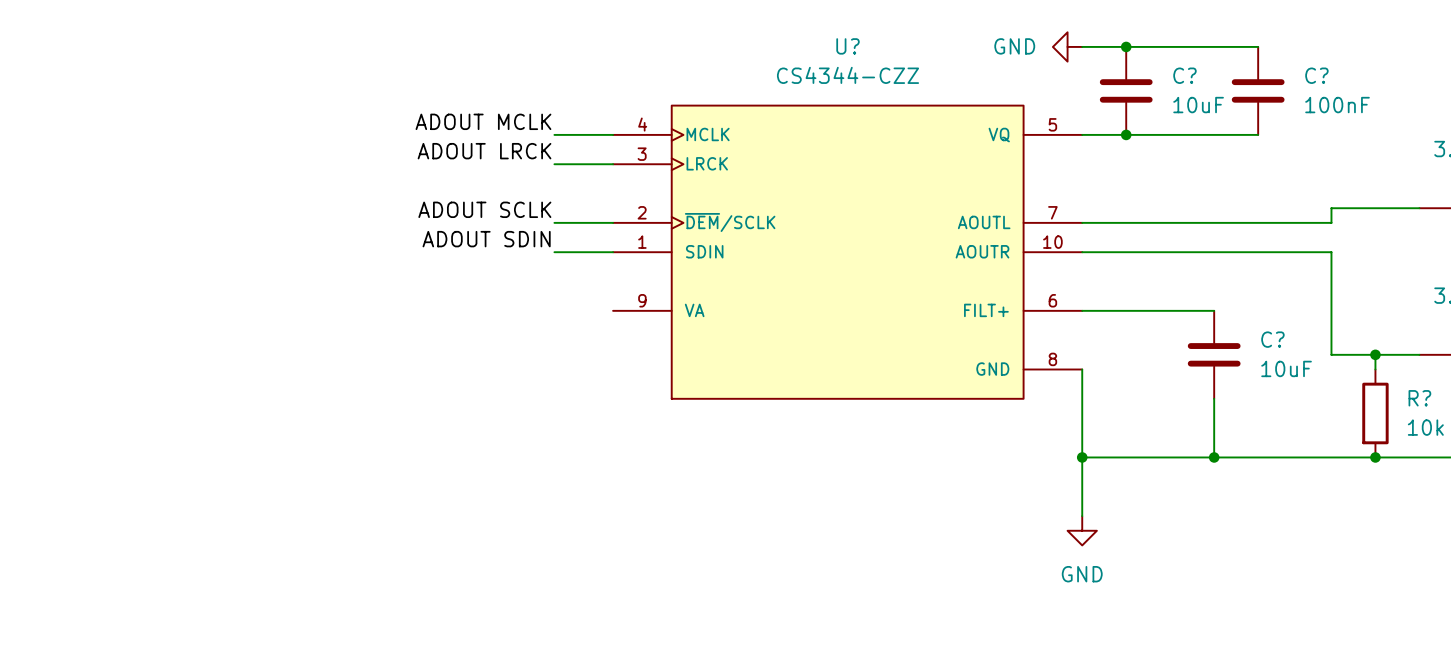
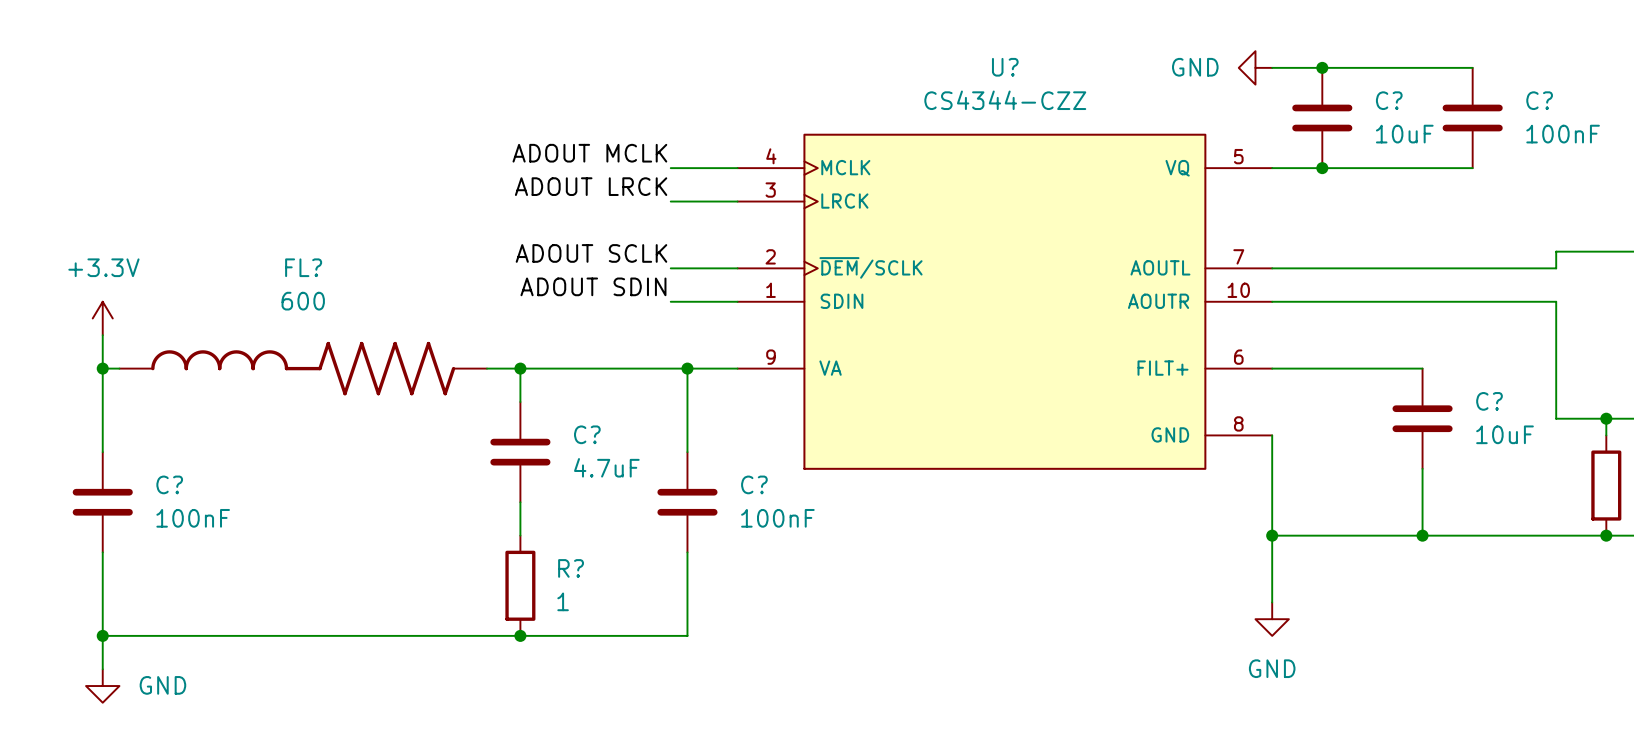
power symbol: none -> +3.3V (102, 318)
wire: none -> (102, 335) (102, 452)
wire: none -> (102, 368) (119, 368)
junction: none -> (102, 368)
FL?: none -> 600 (303, 368)
wire: none -> (486, 368) (737, 368)
wire: none -> (520, 368) (520, 402)
junction: none -> (520, 368)
wire: none -> (687, 368) (687, 452)
junction: none -> (687, 368)
C?: none -> 4.7uF (520, 452)
C?: none -> 100nF (102, 502)
wire: none -> (520, 502) (520, 535)
C?: none -> 100nF (687, 502)
wire: none -> (102, 552) (102, 669)
wire: none -> (687, 552) (687, 635) (102, 635)
R?: none -> 1 (520, 585)
junction: none -> (102, 635)
junction: none -> (520, 635)
power symbol: none -> GND (102, 686)

